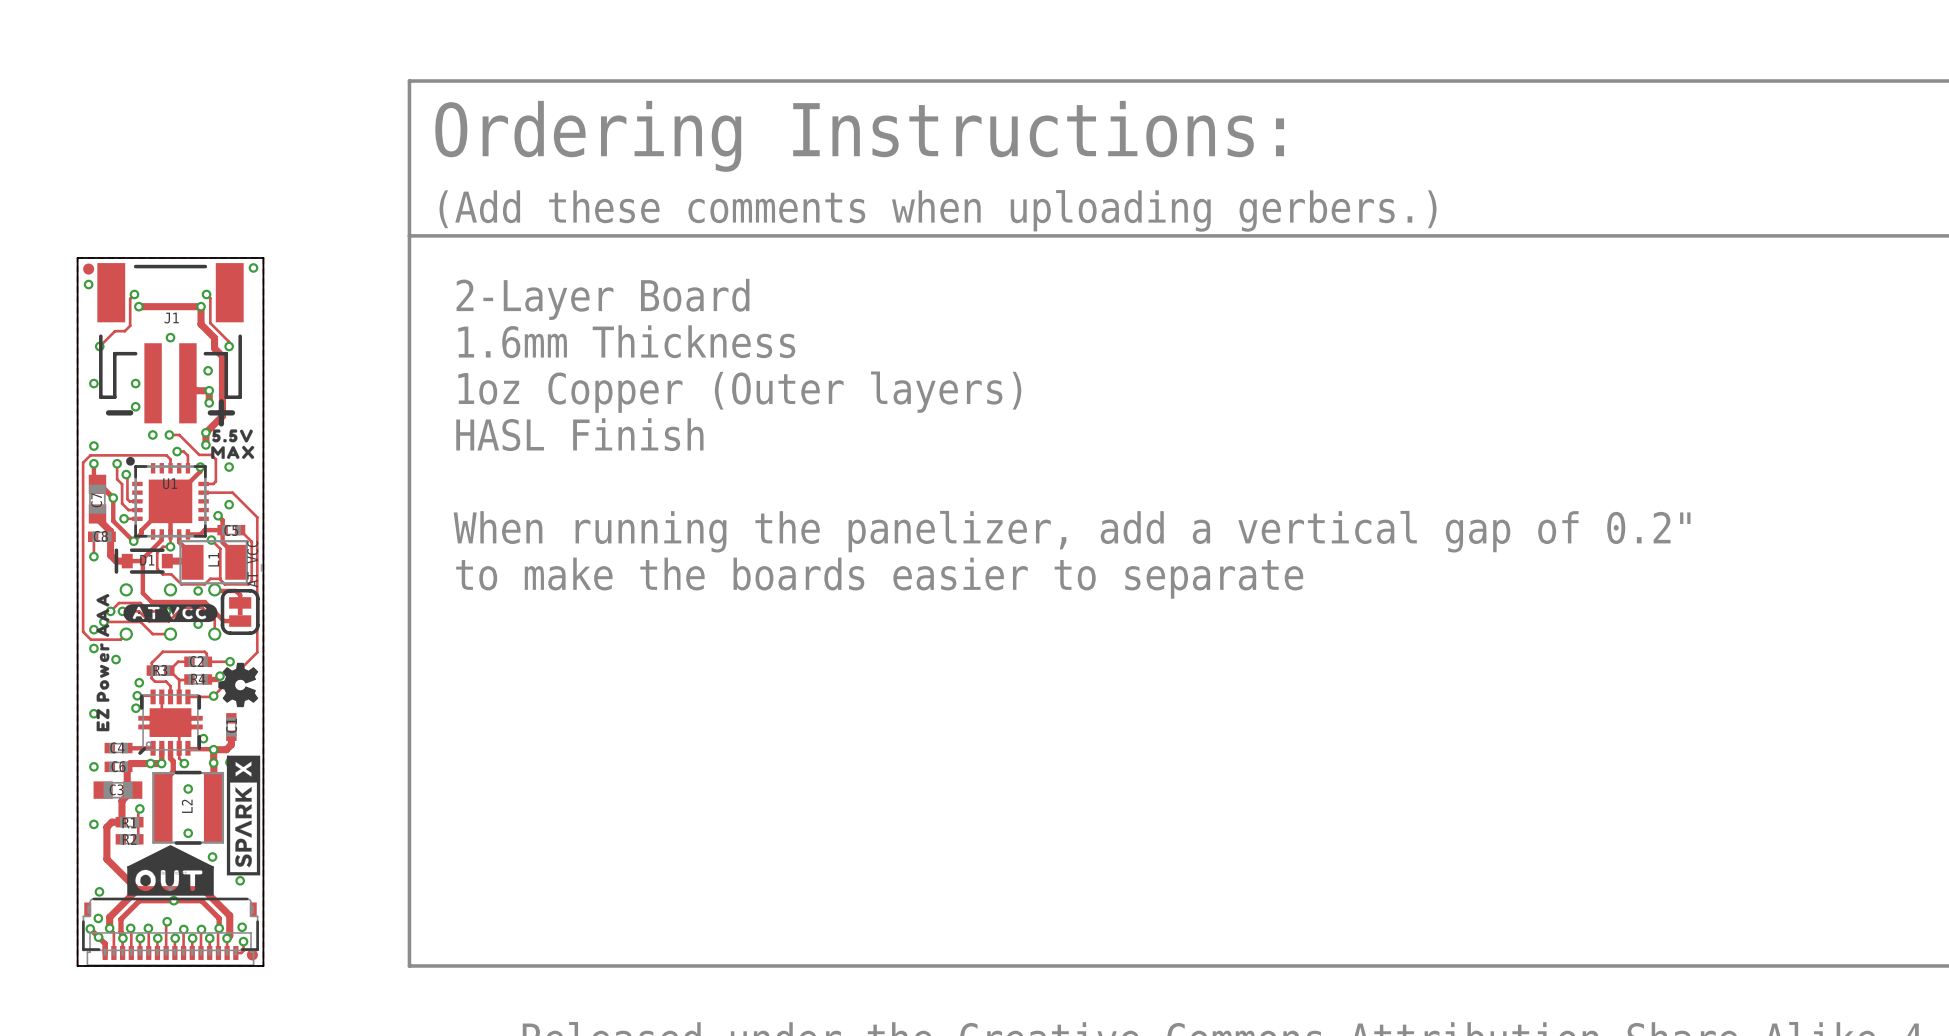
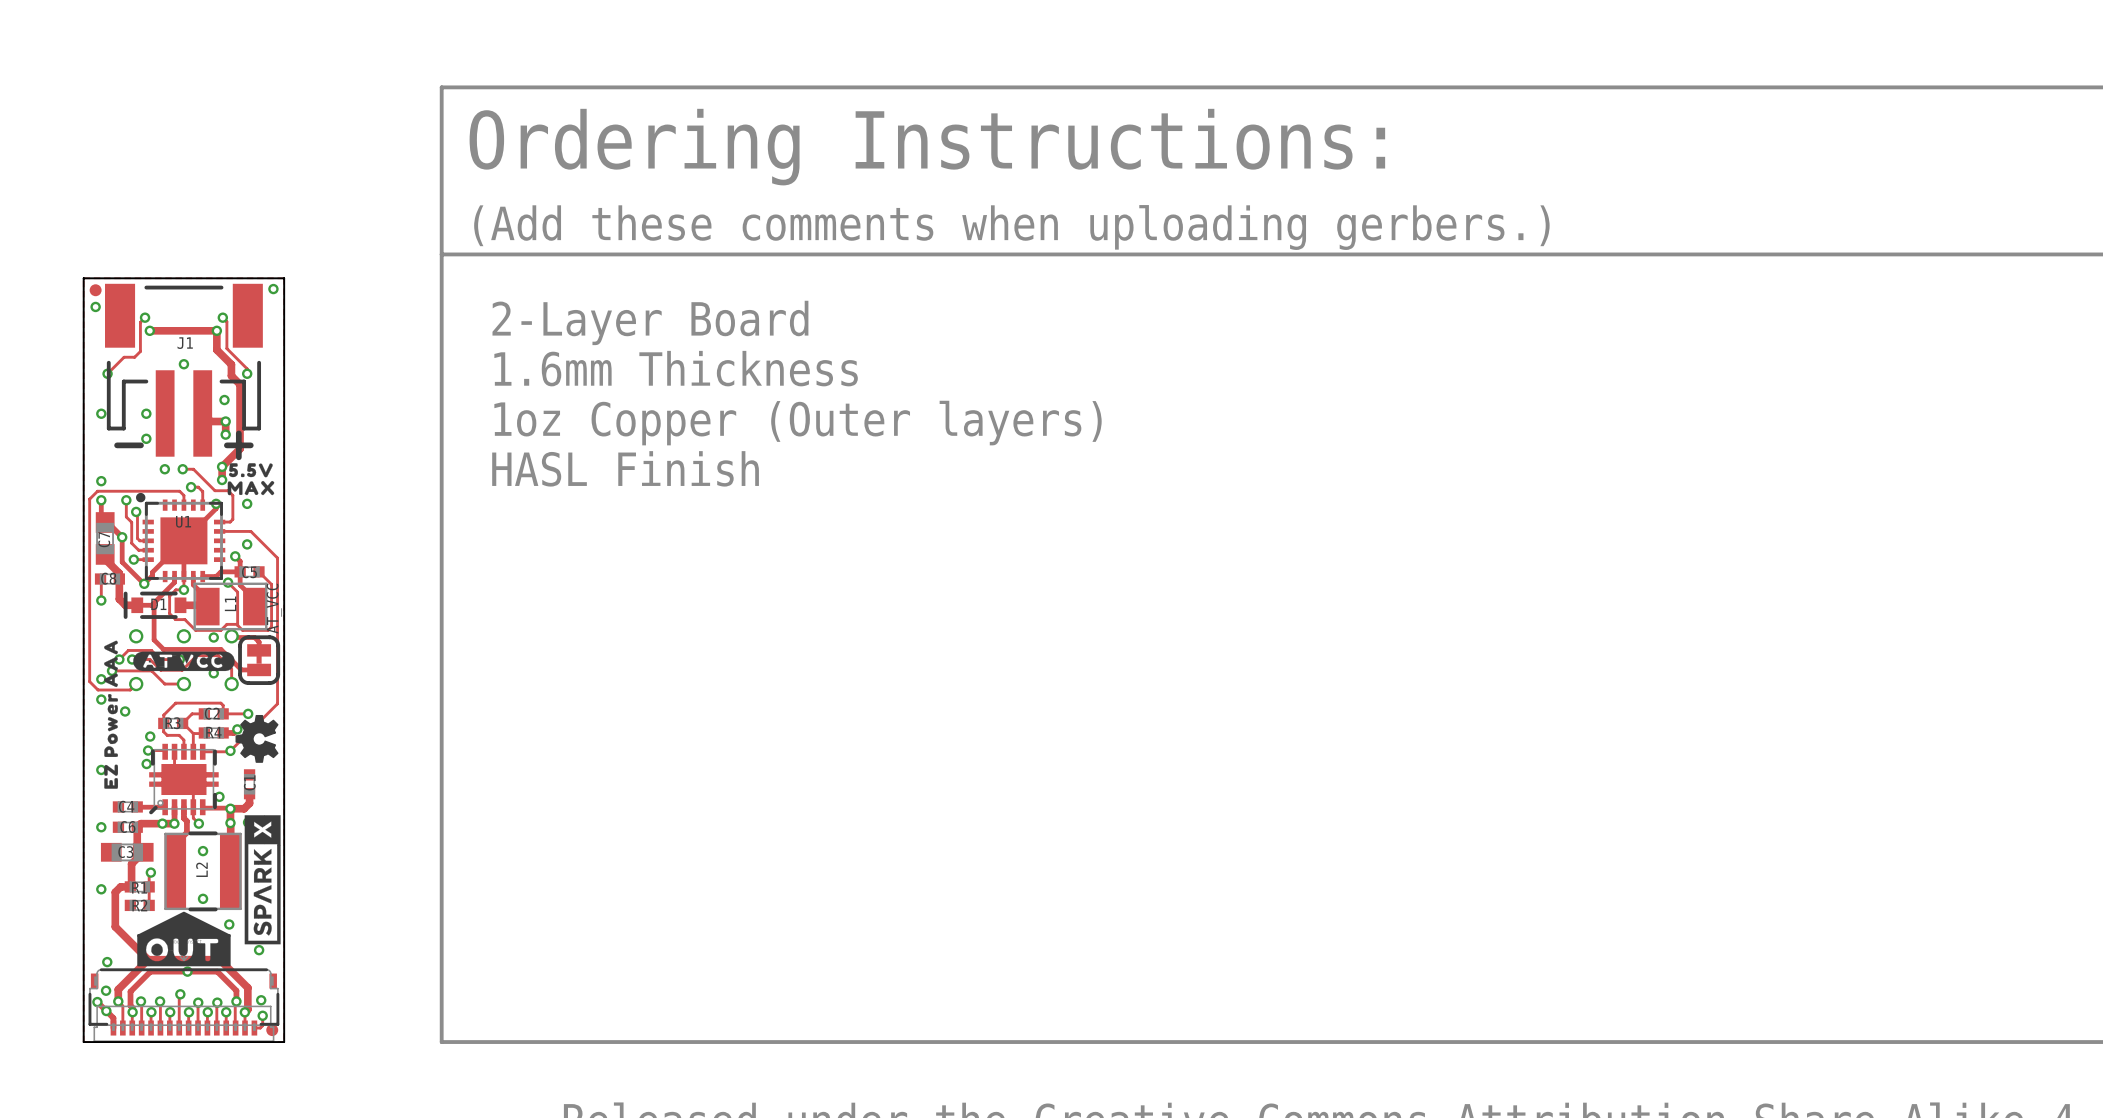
text: When running the panelizer, add a vertical gap of 0.2" (1072, 531) -> none
text: to make the boards easier to separate (879, 578) -> none

